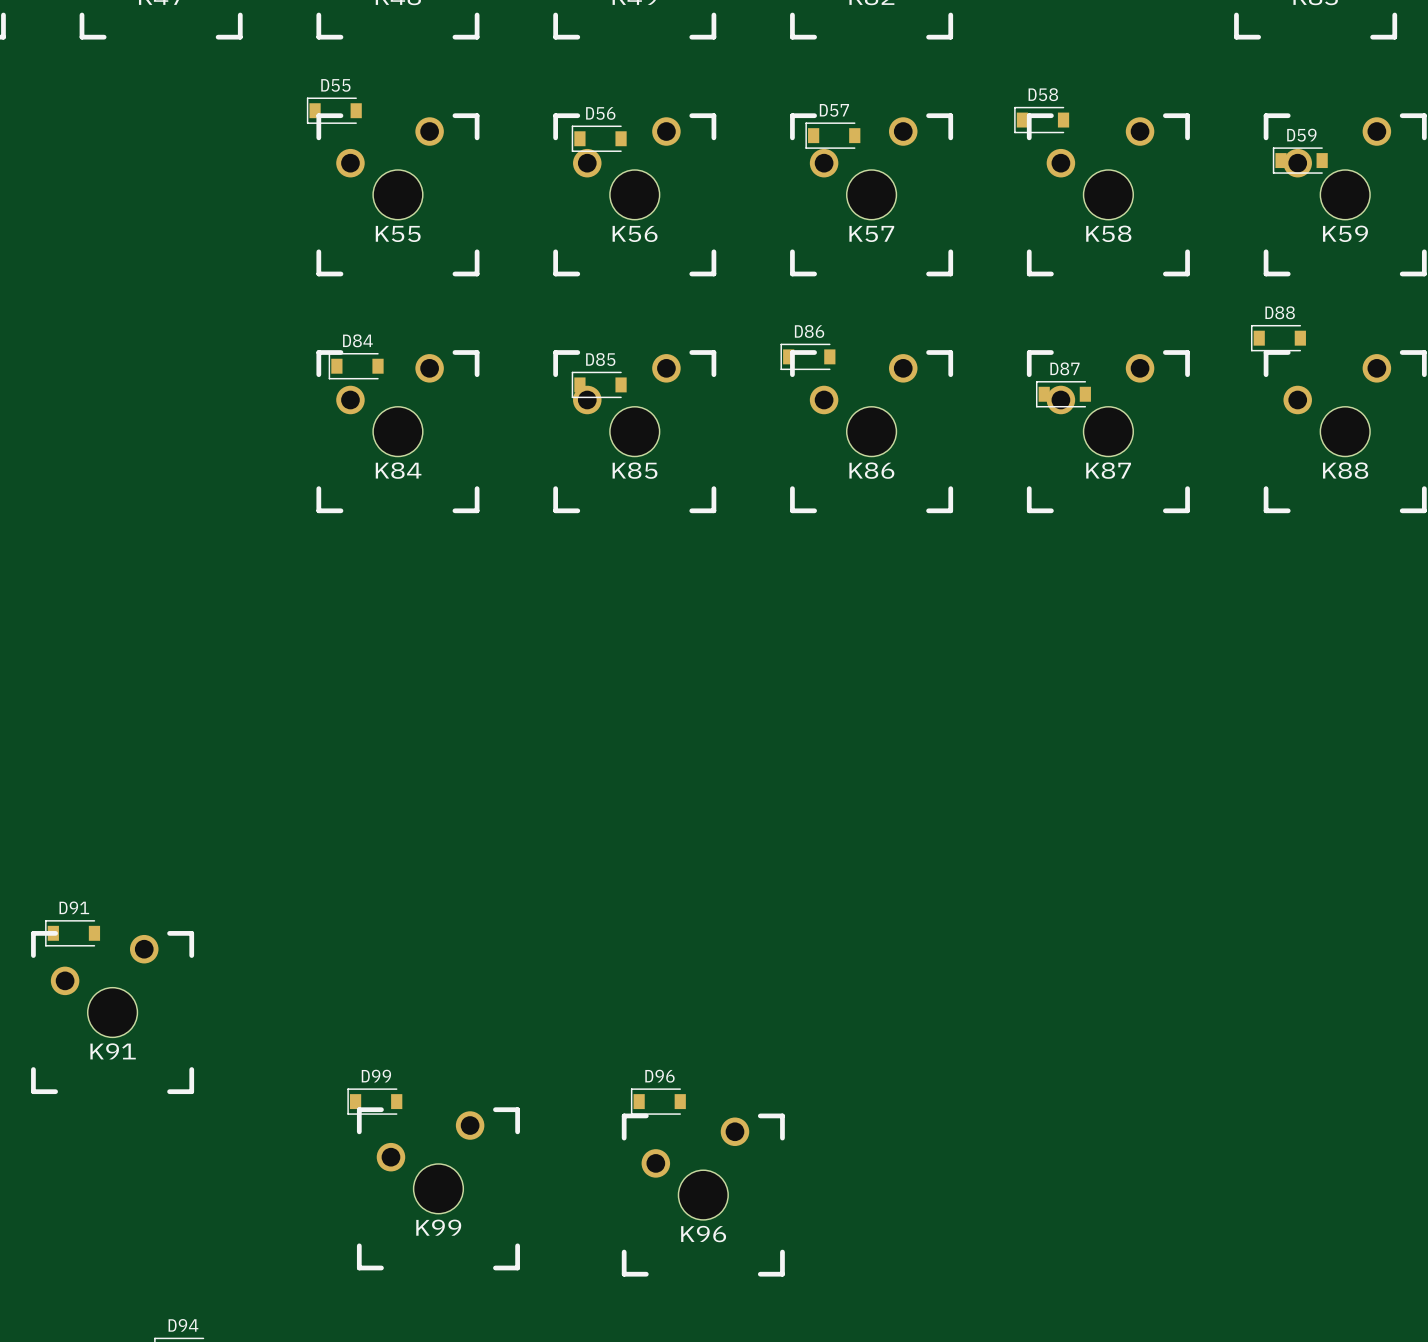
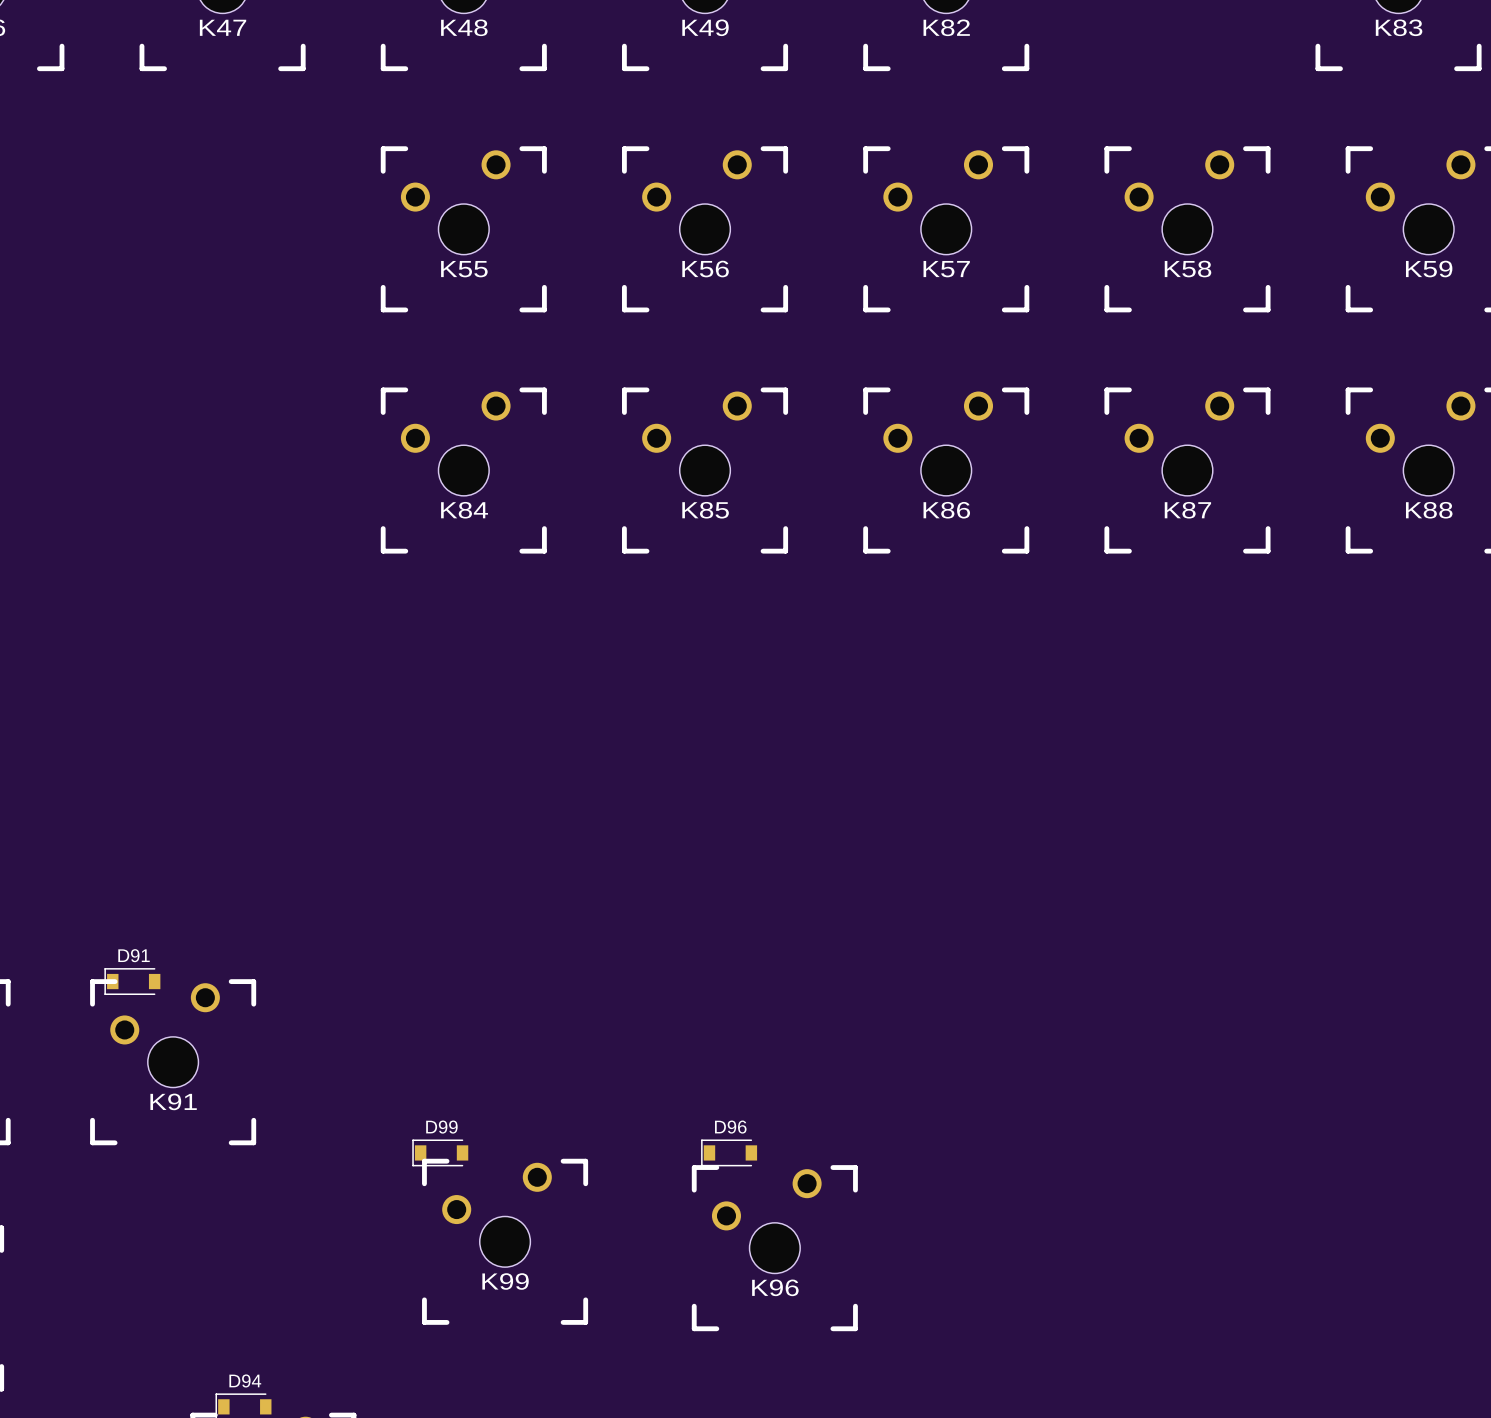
D55: (334, 110) -> none
D58: (1041, 120) -> none
D57: (832, 135) -> none
D56: (599, 138) -> none
D59: (1300, 160) -> none
D88: (1278, 338) -> none
D86: (807, 356) -> none
D84: (356, 366) -> none
D85: (599, 384) -> none
D87: (1063, 394) -> none

